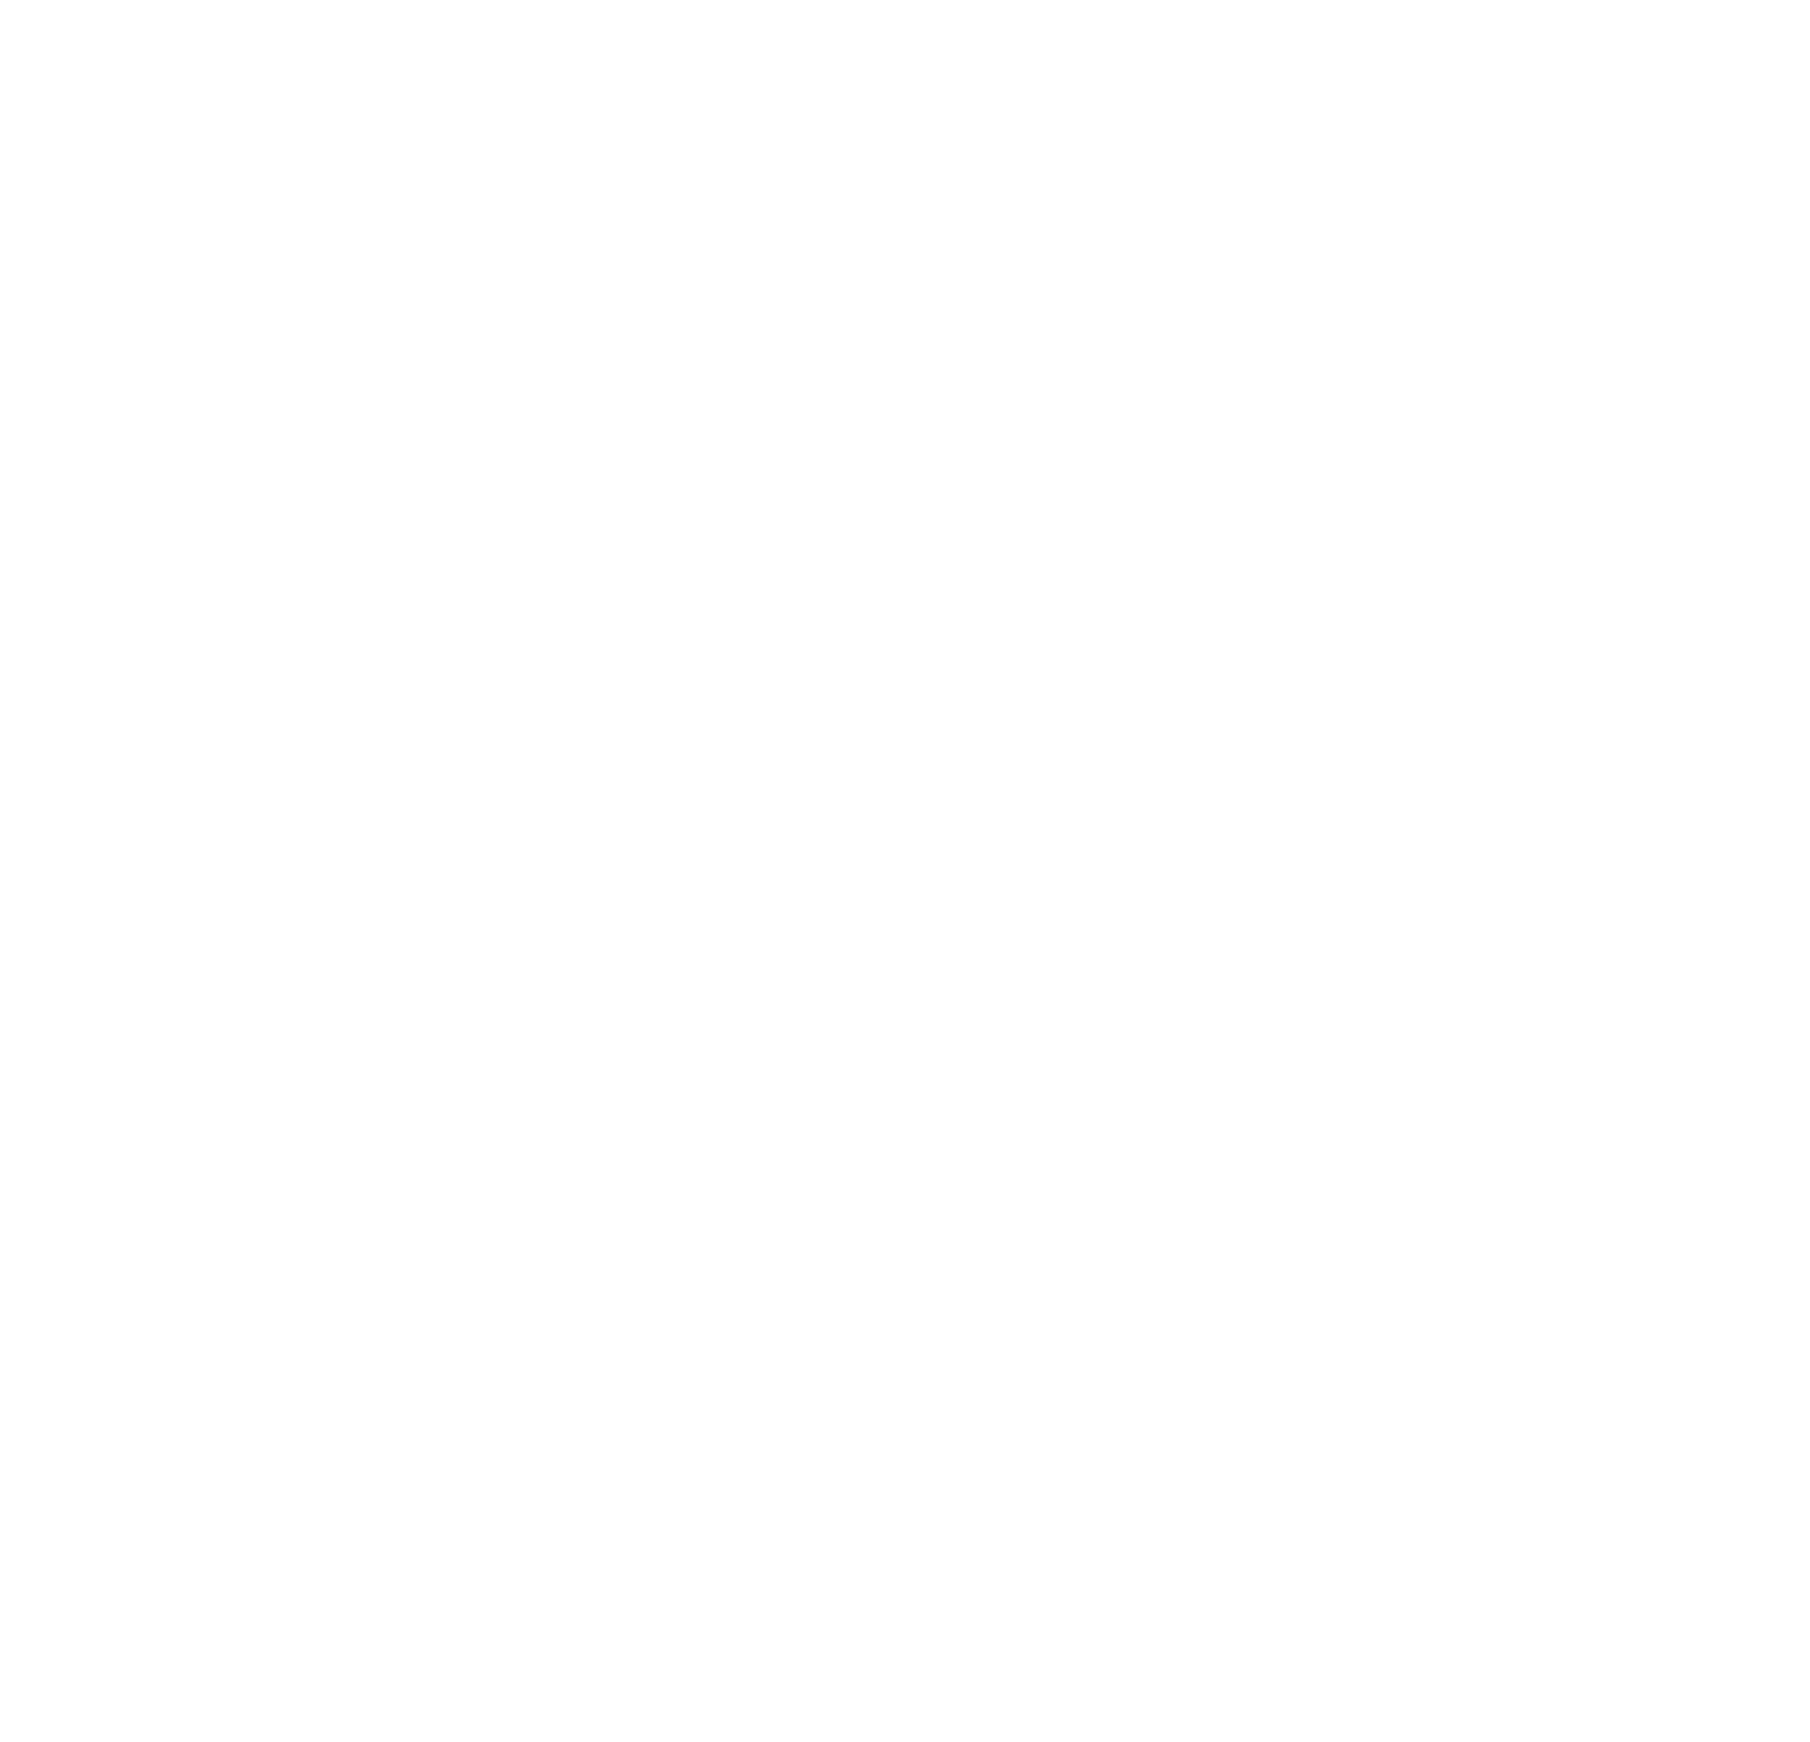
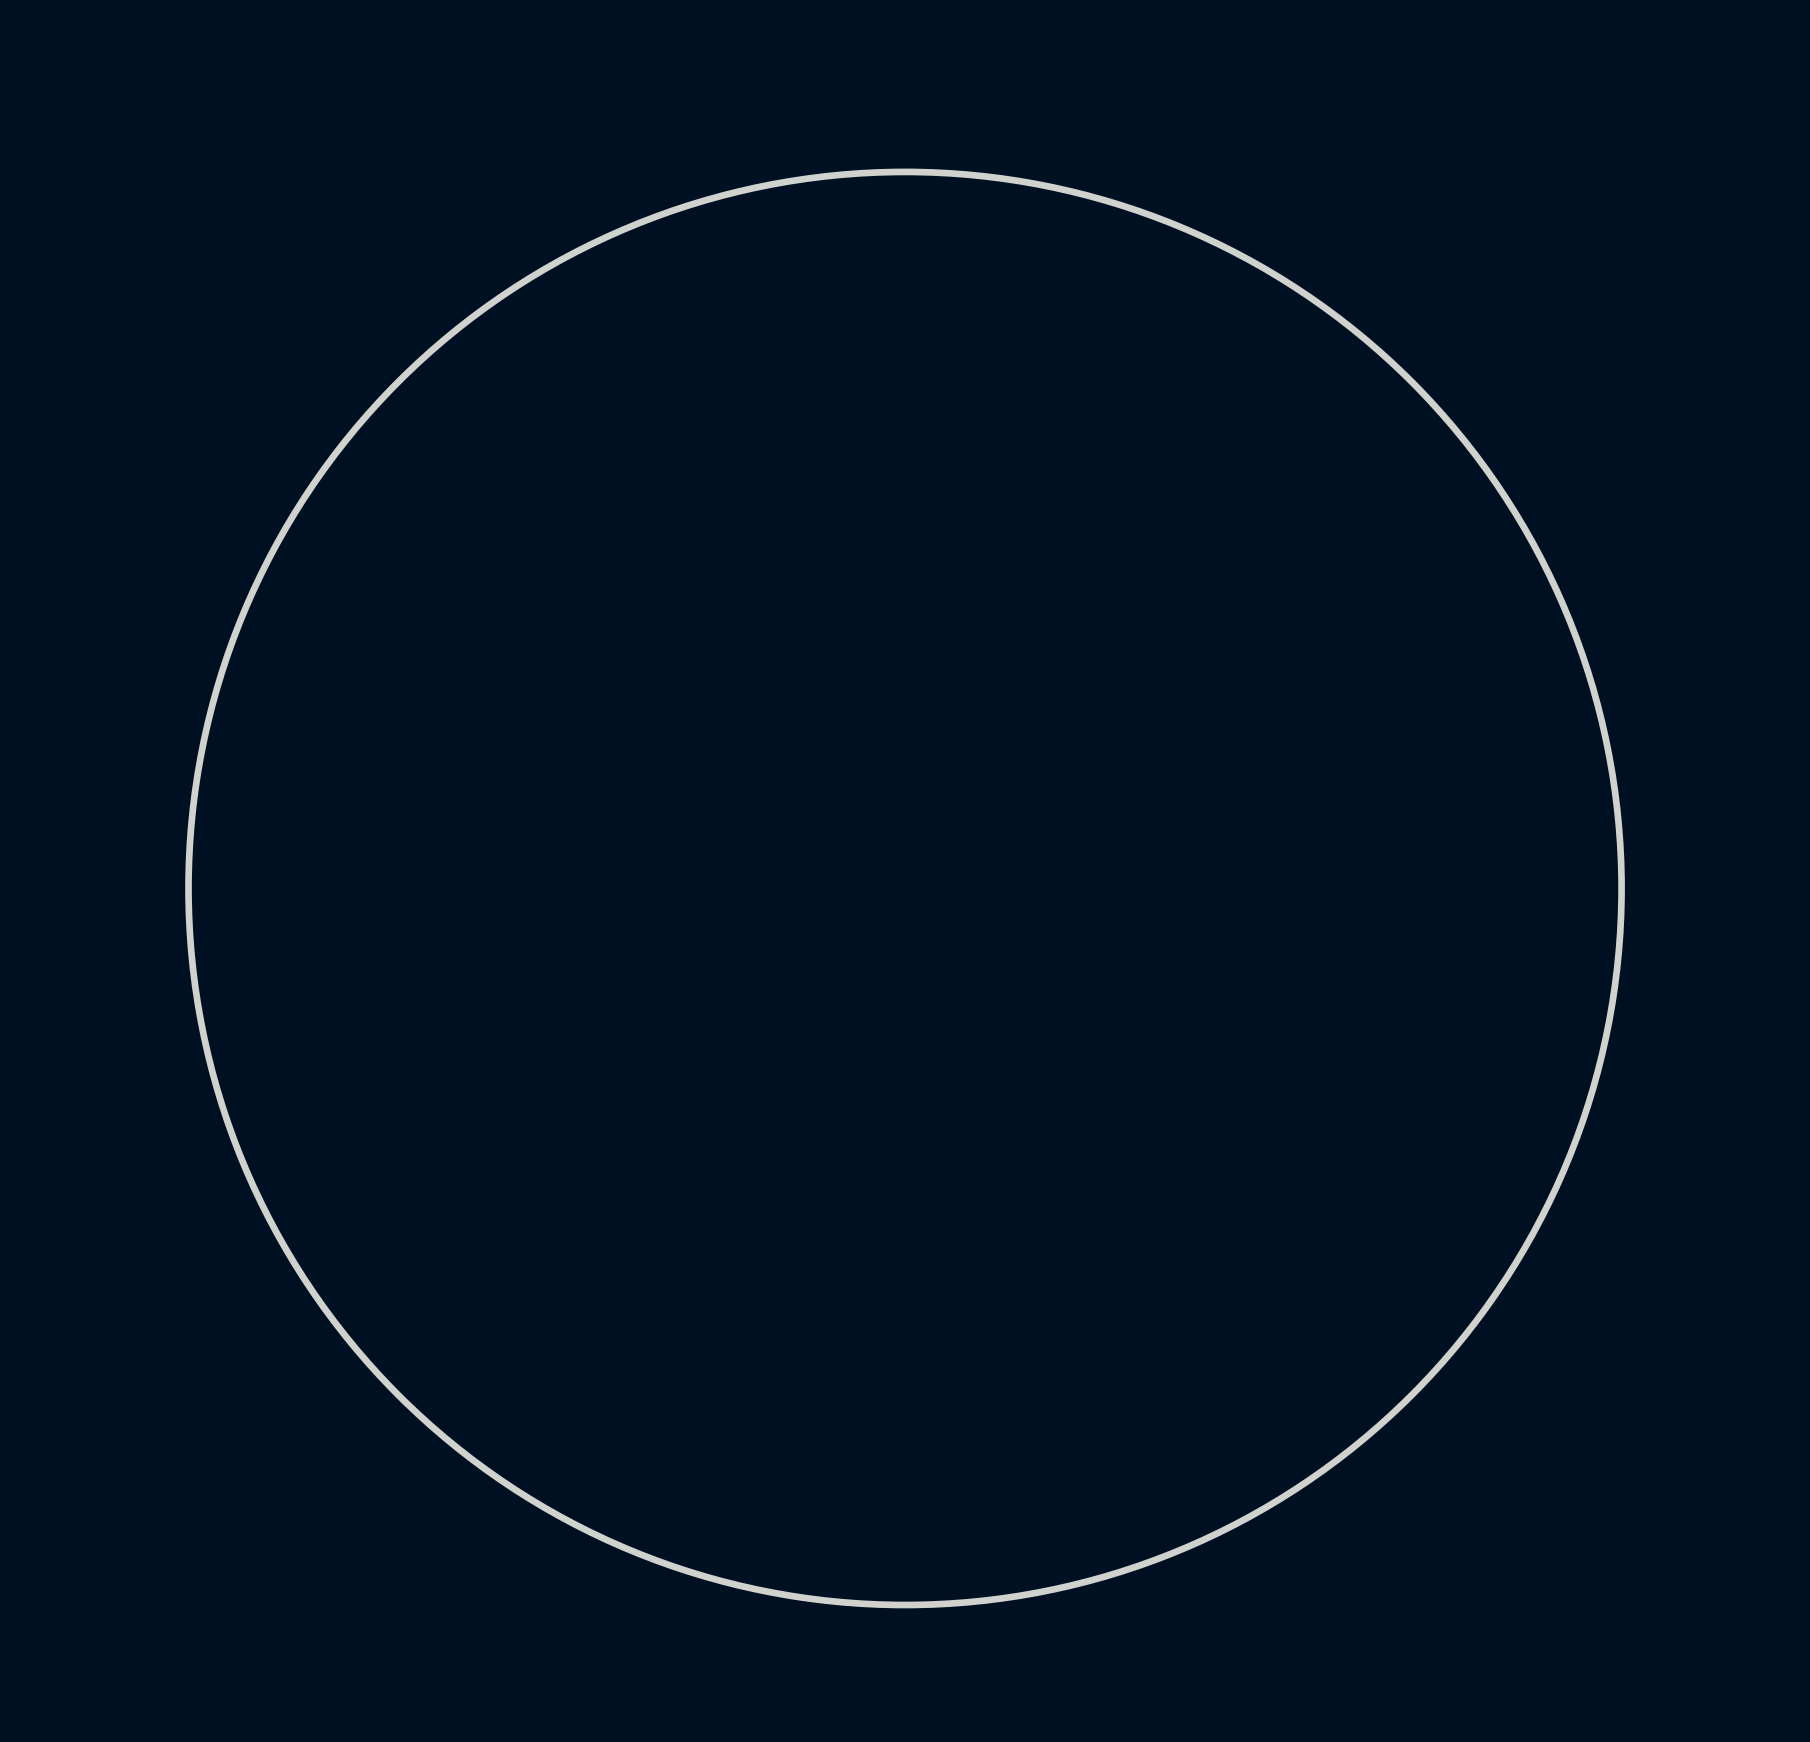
round board edge: none -> [185, 168, 1625, 1609]

